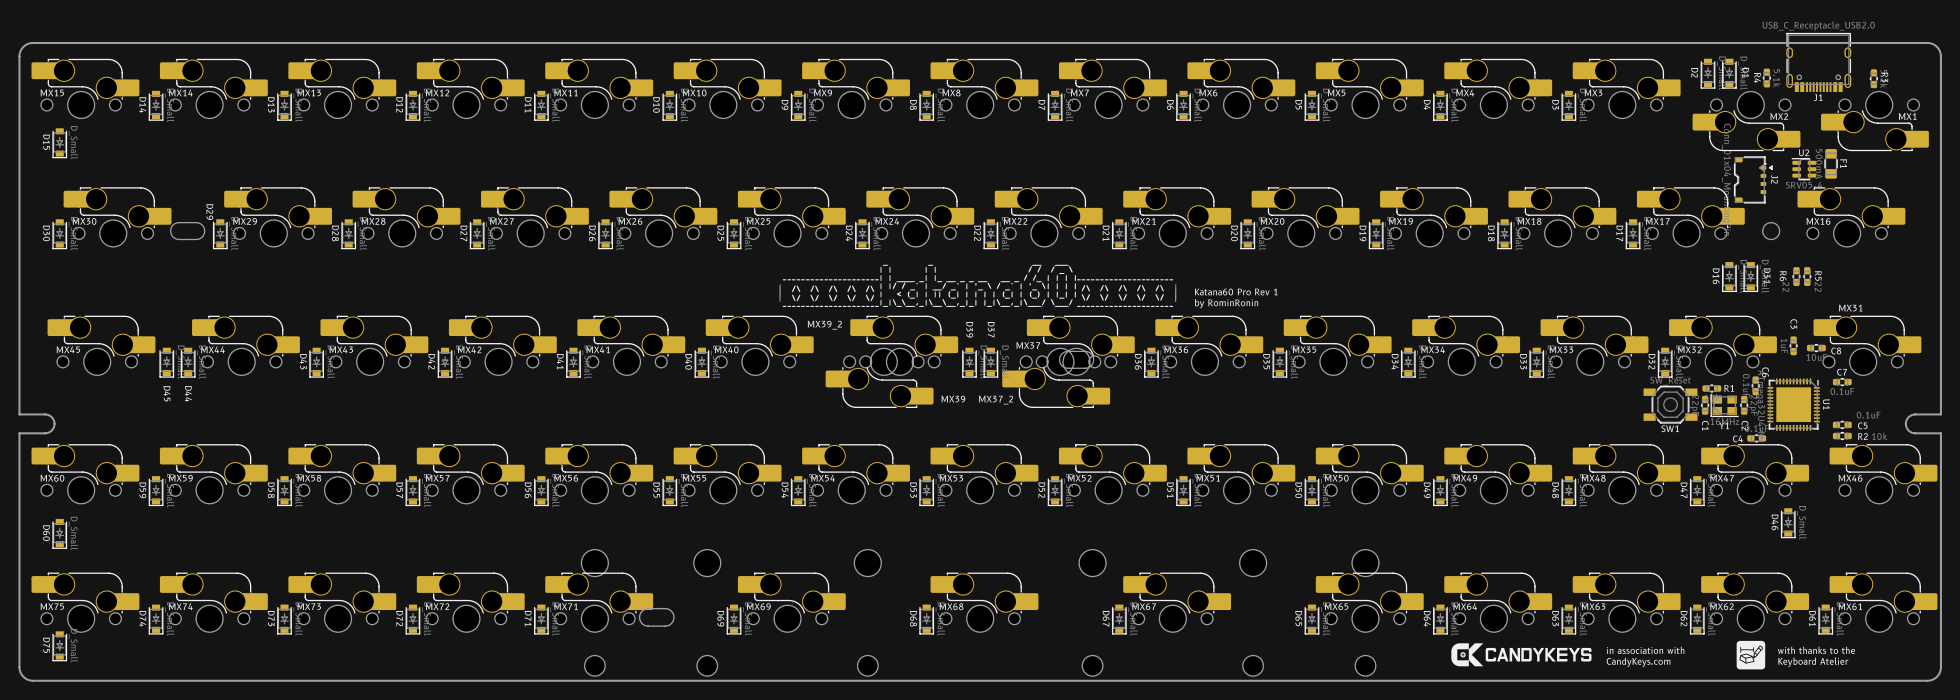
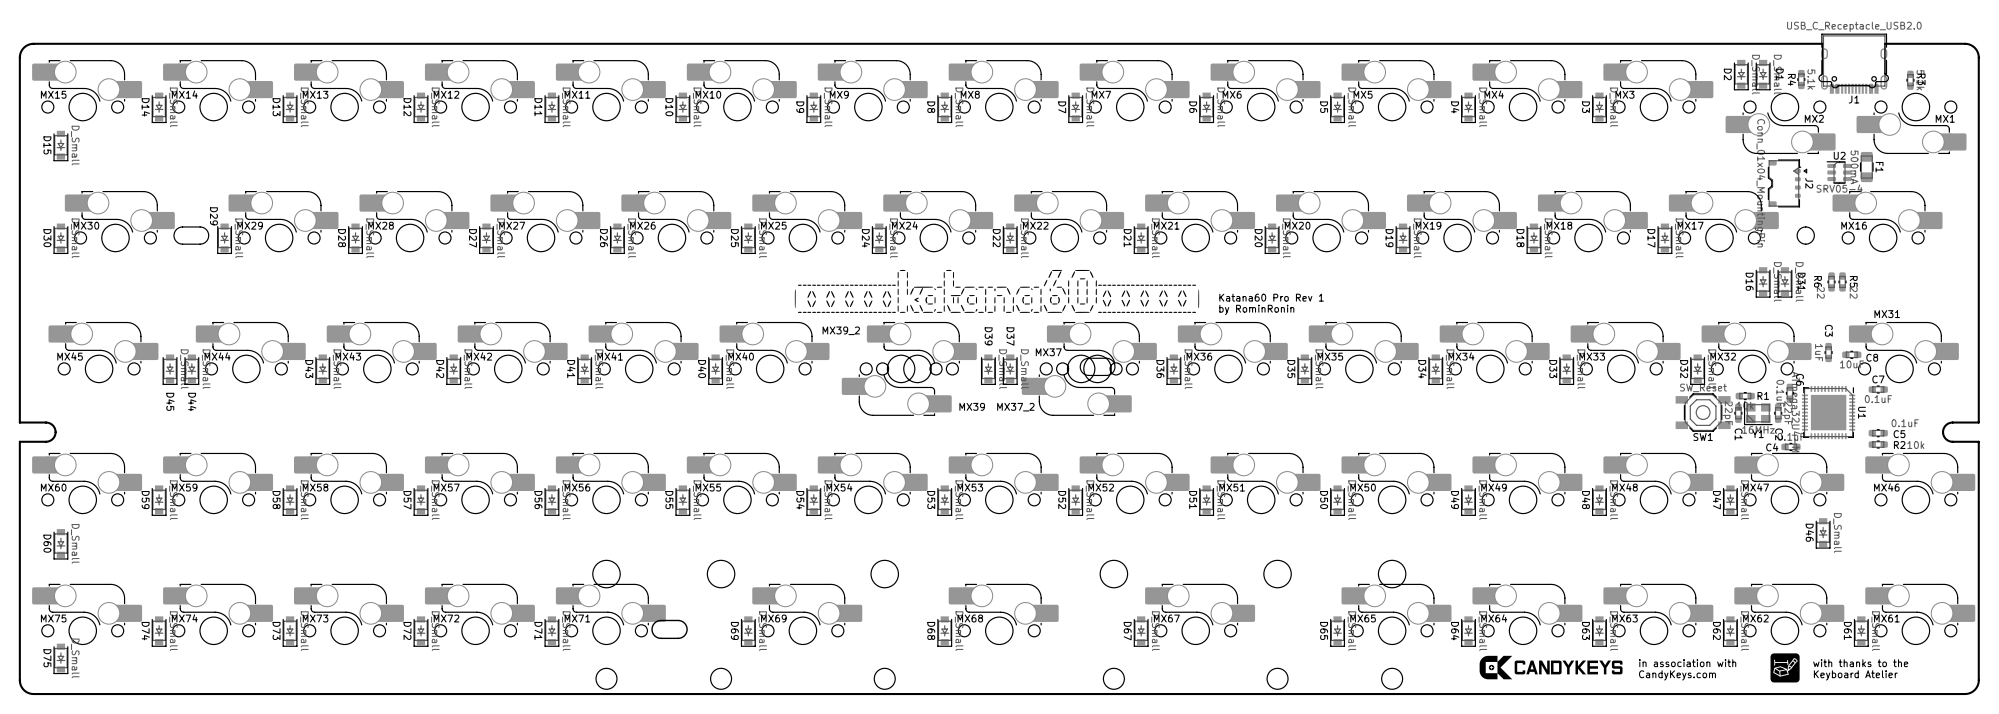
drawing shape: [18, 41, 1942, 682] -> [18, 42, 1980, 696]

